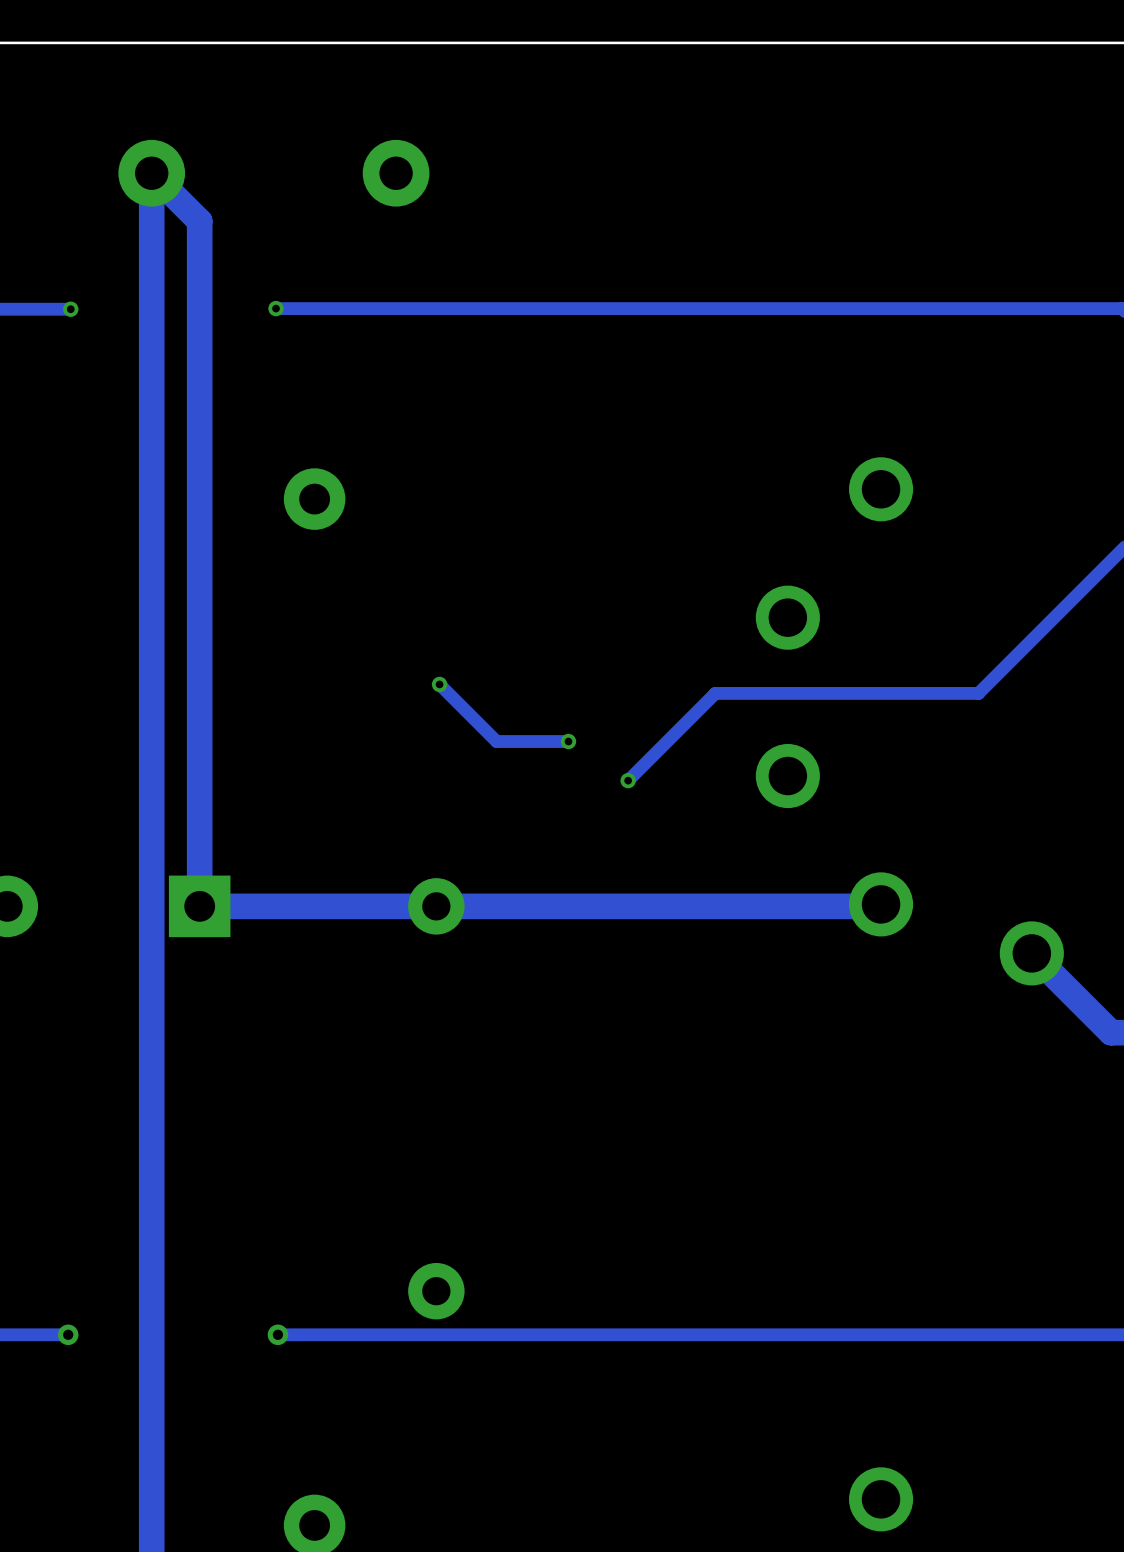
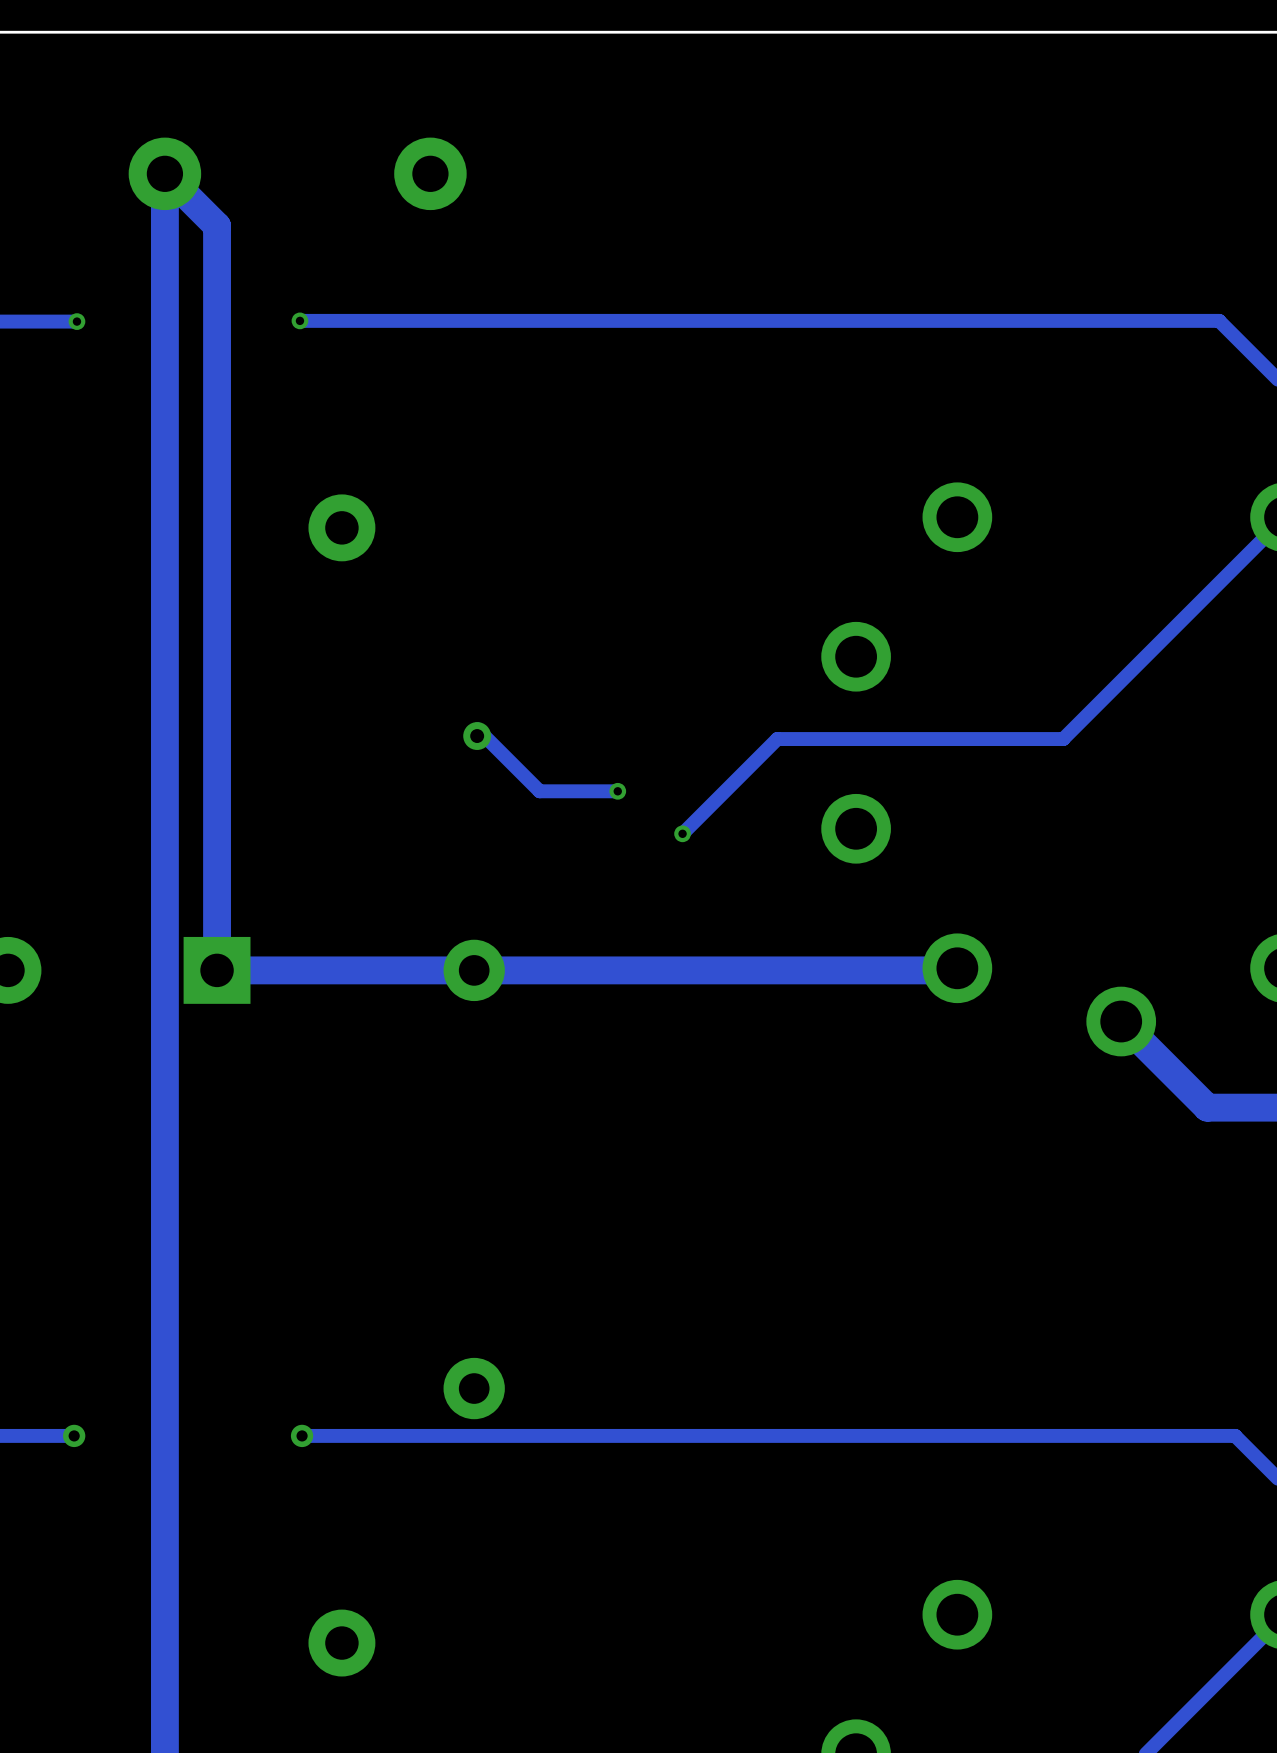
via size: [431, 676, 448, 693] -> [463, 722, 492, 750]

